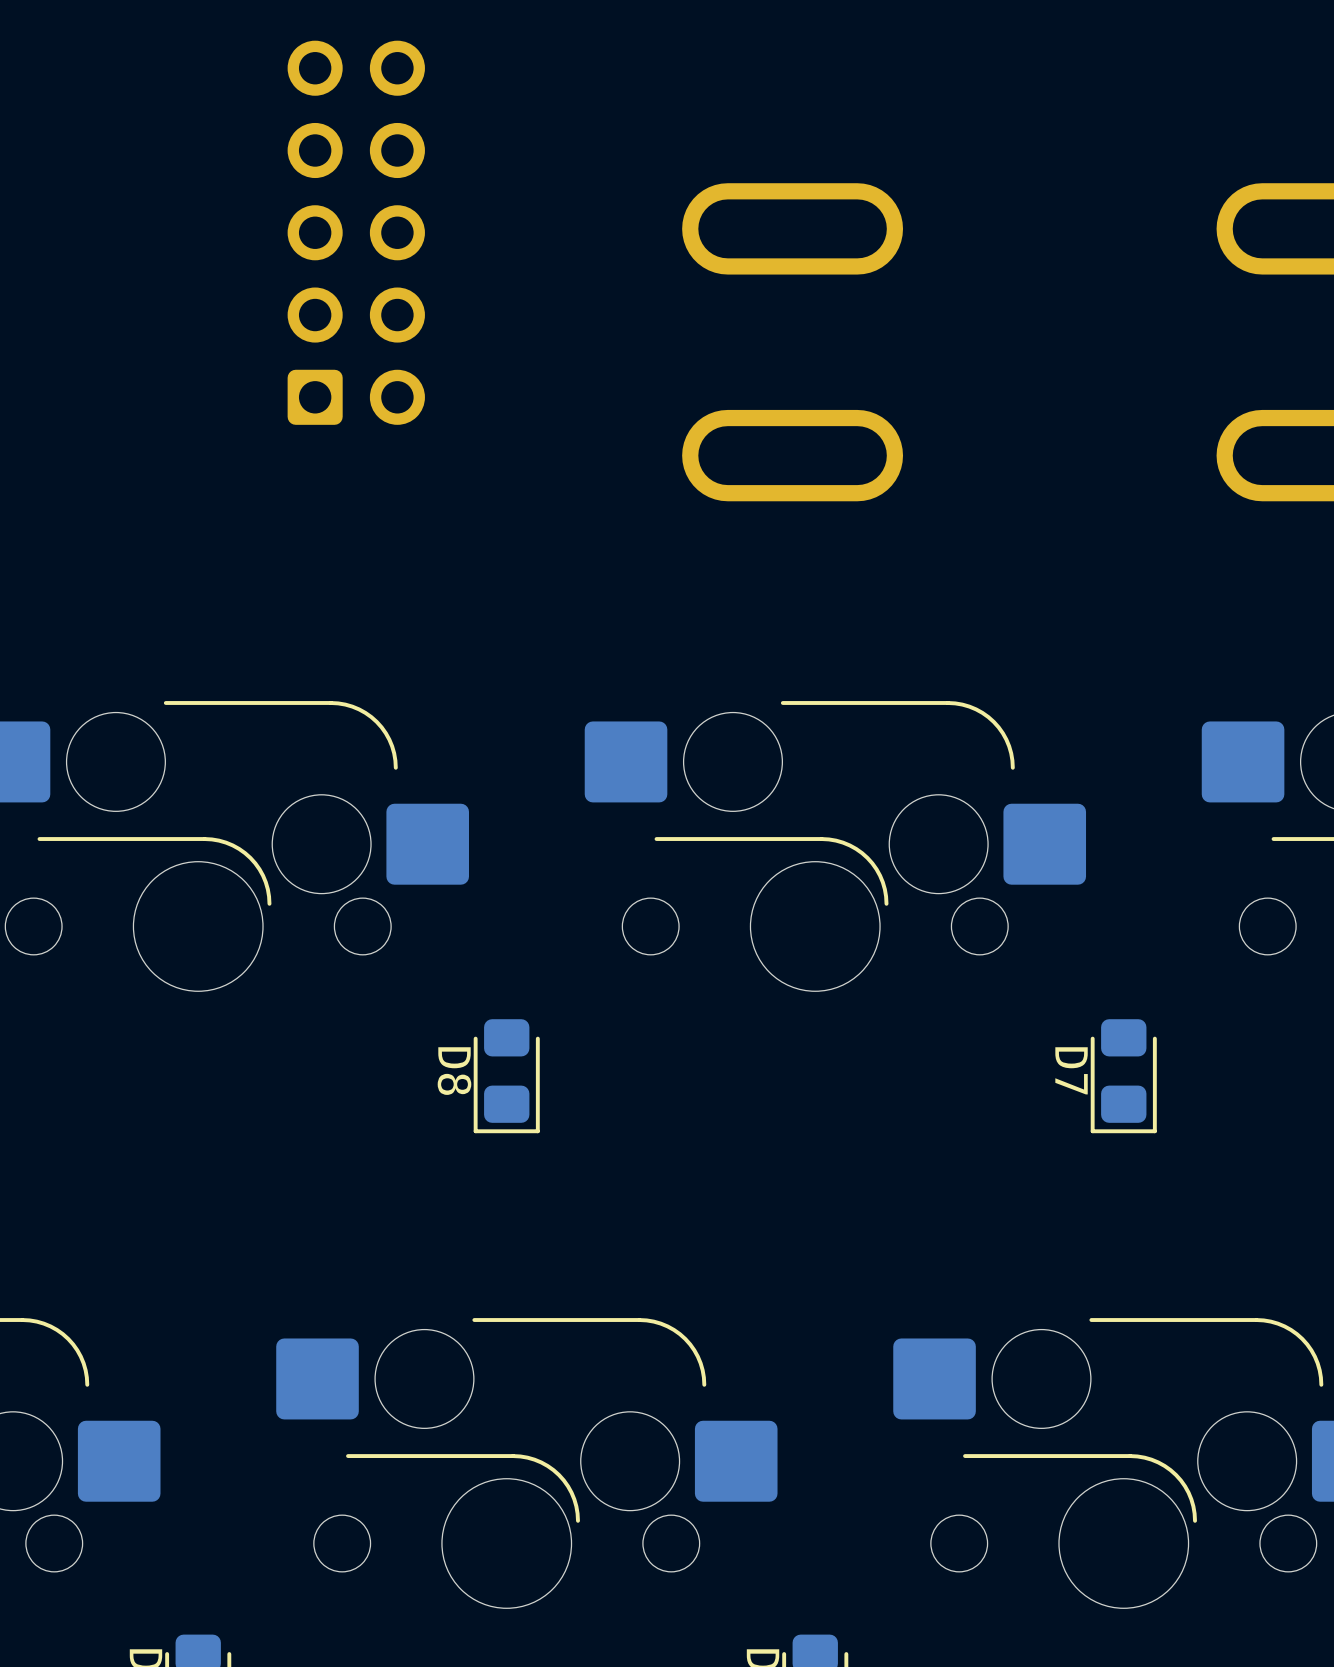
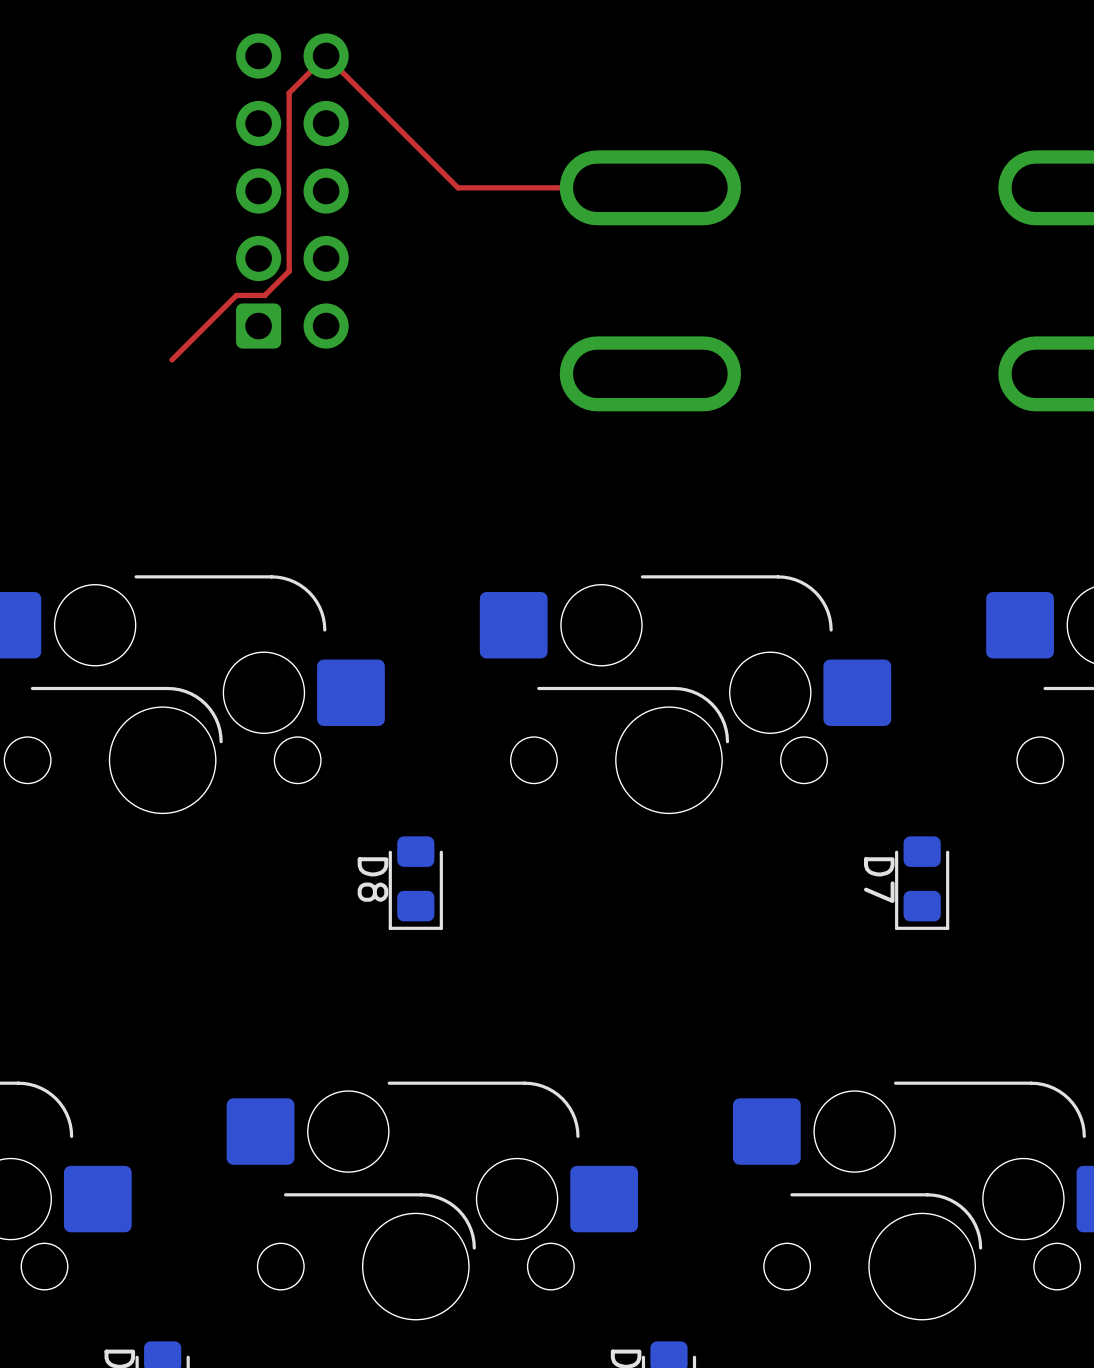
top track: none -> (650, 187) (457, 187) (326, 55) (289, 92) (289, 271) (264, 295) (236, 295) (171, 359)

